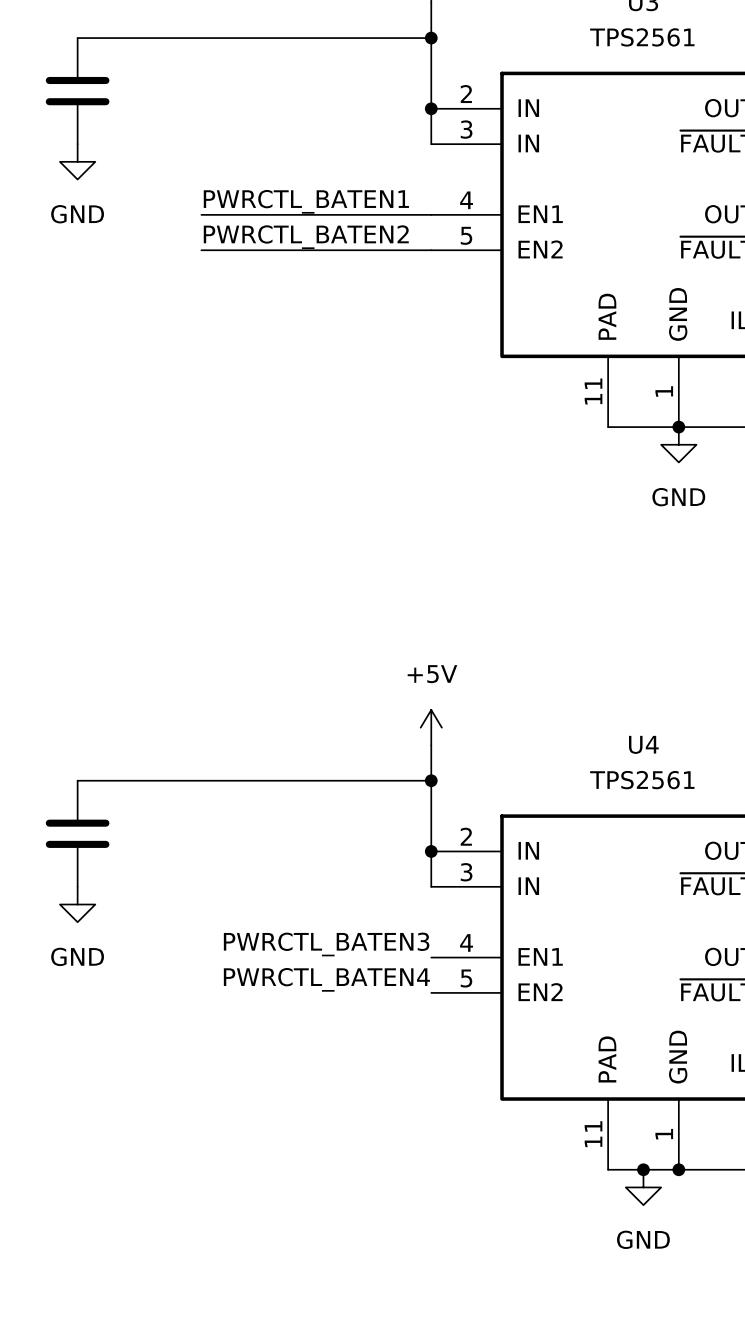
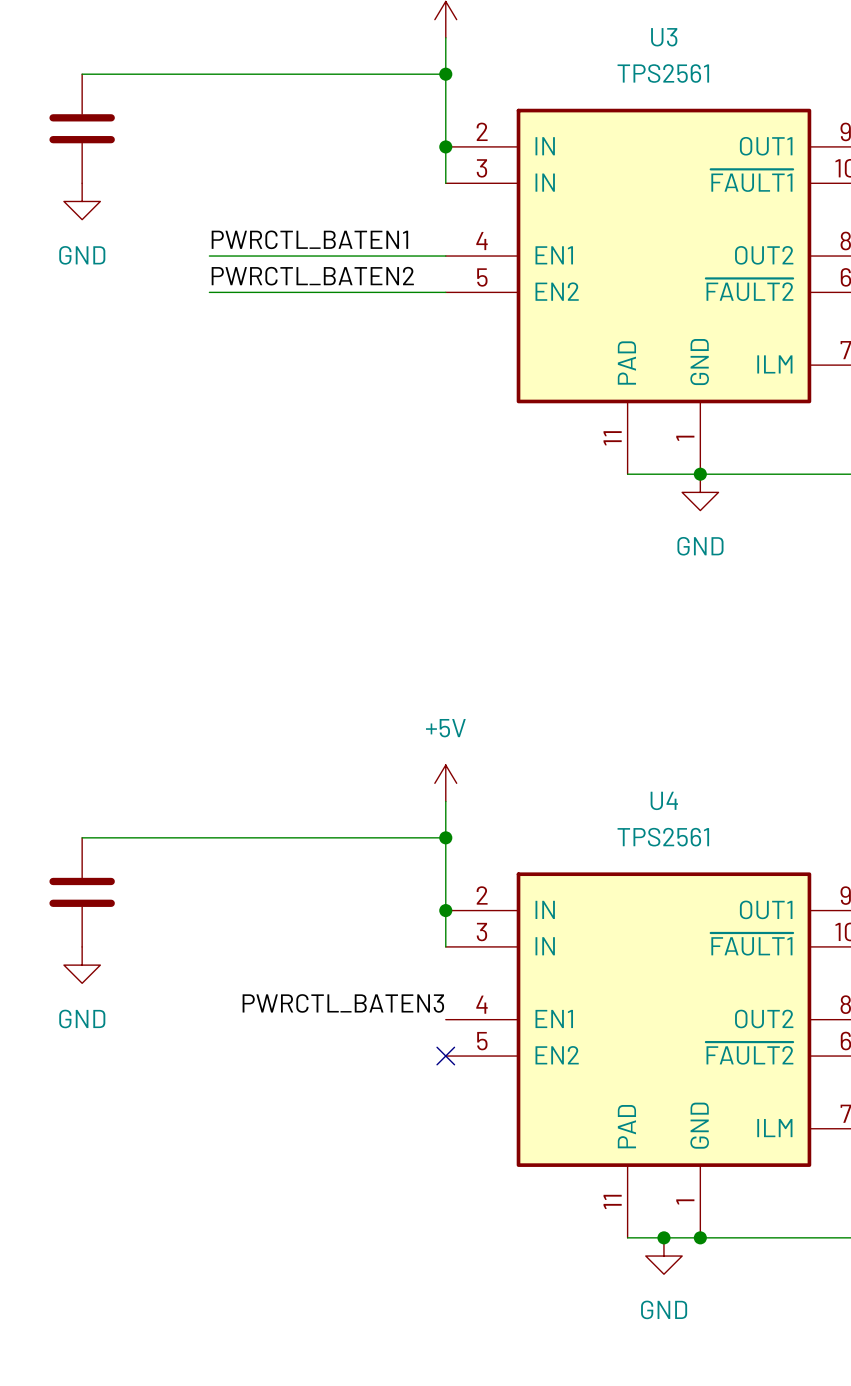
label: PWRCTL_BATEN4 (326, 979) -> none
no-connect mark: none -> (445, 1056)

